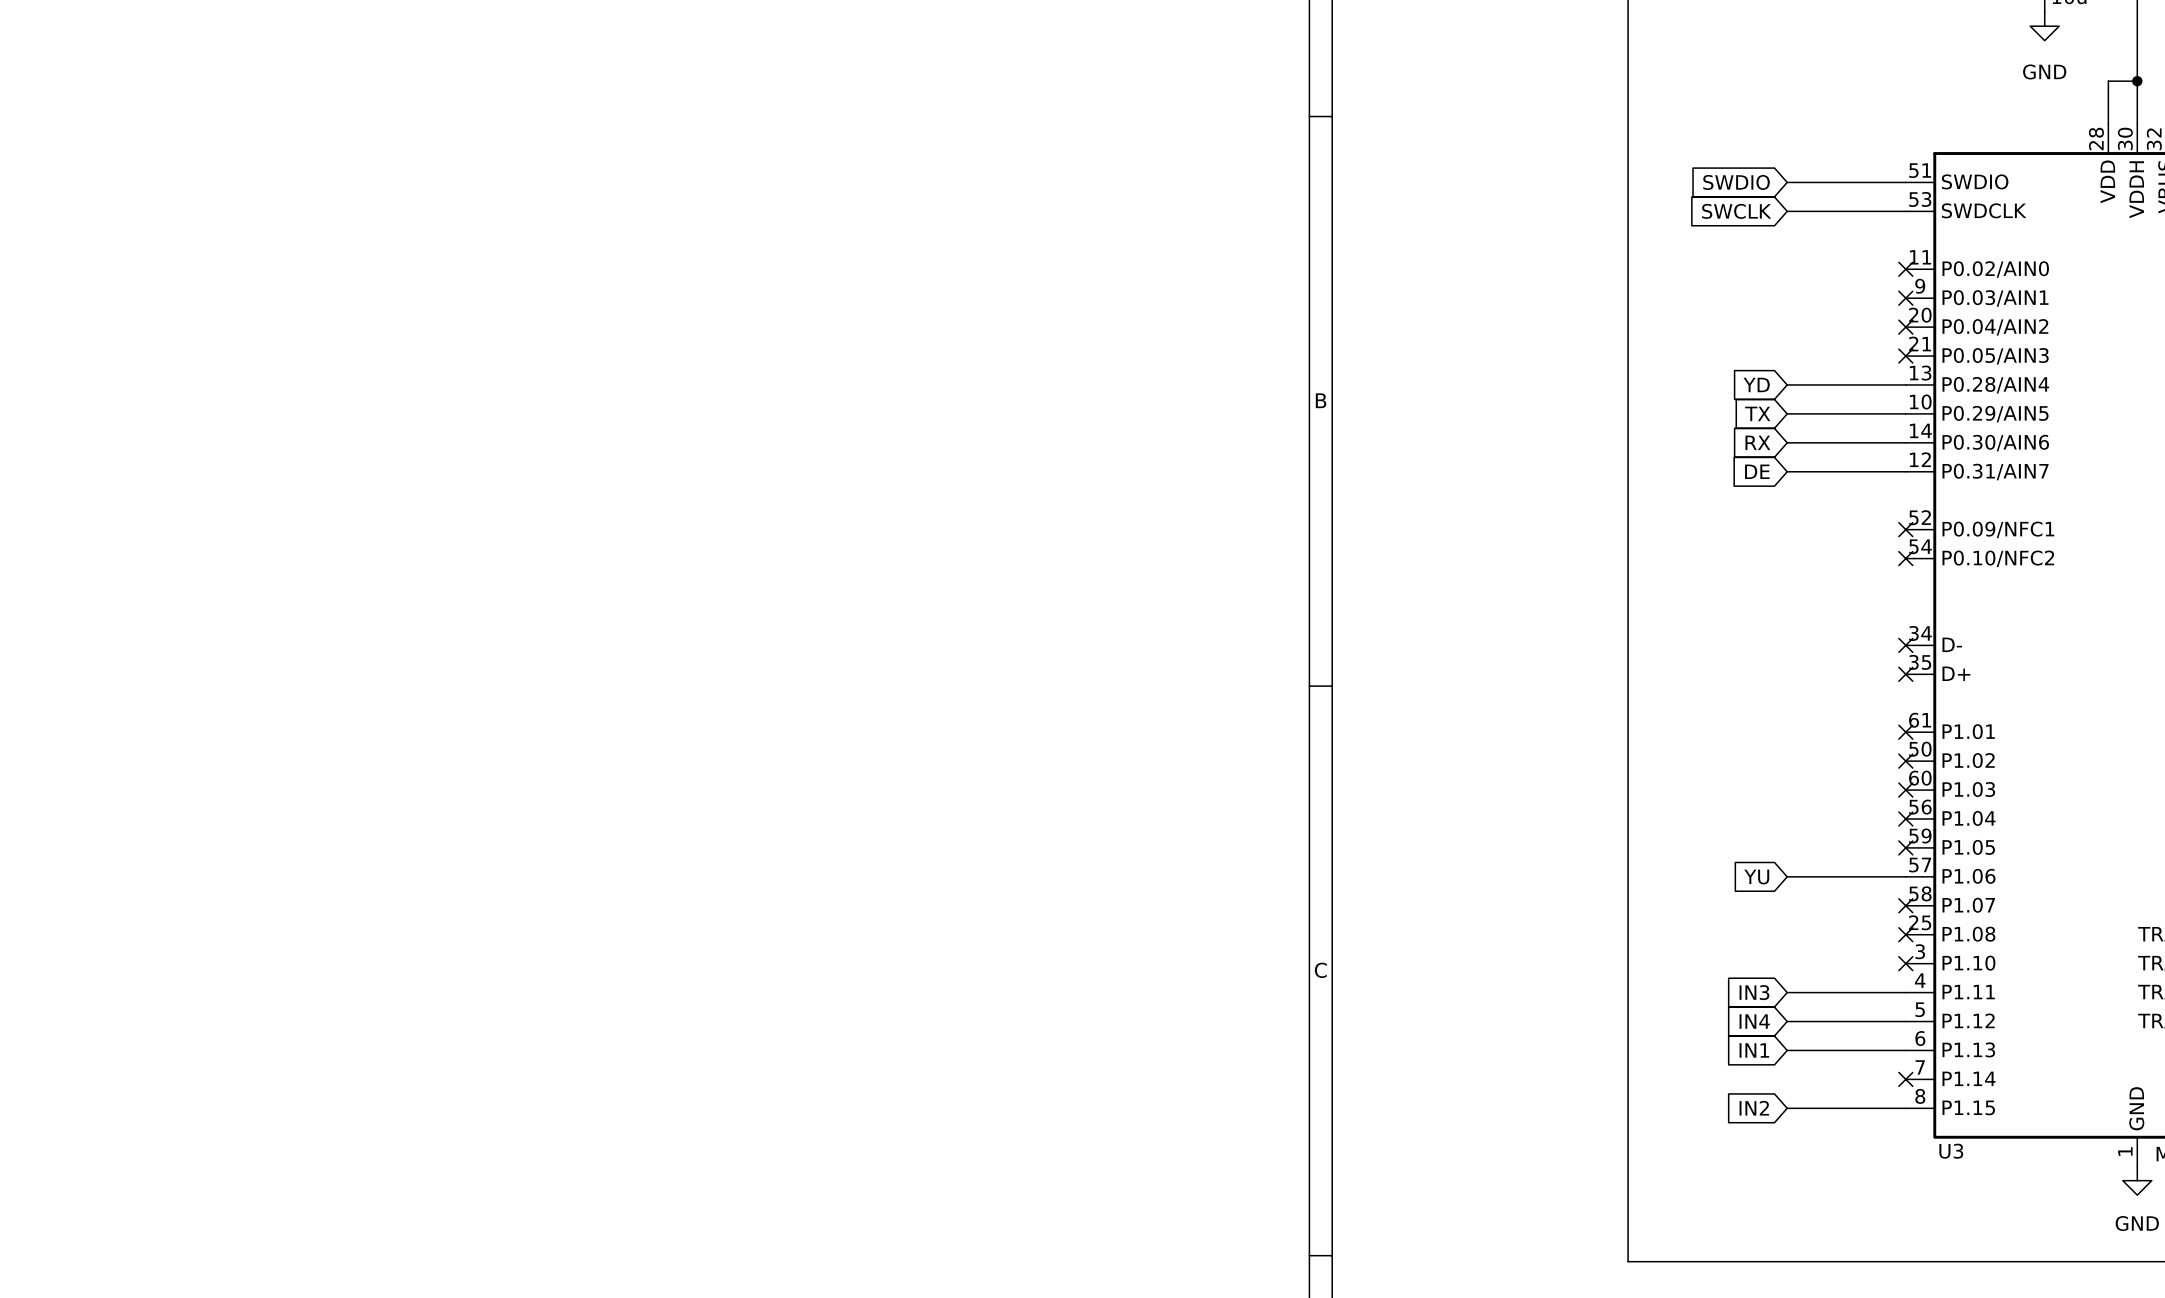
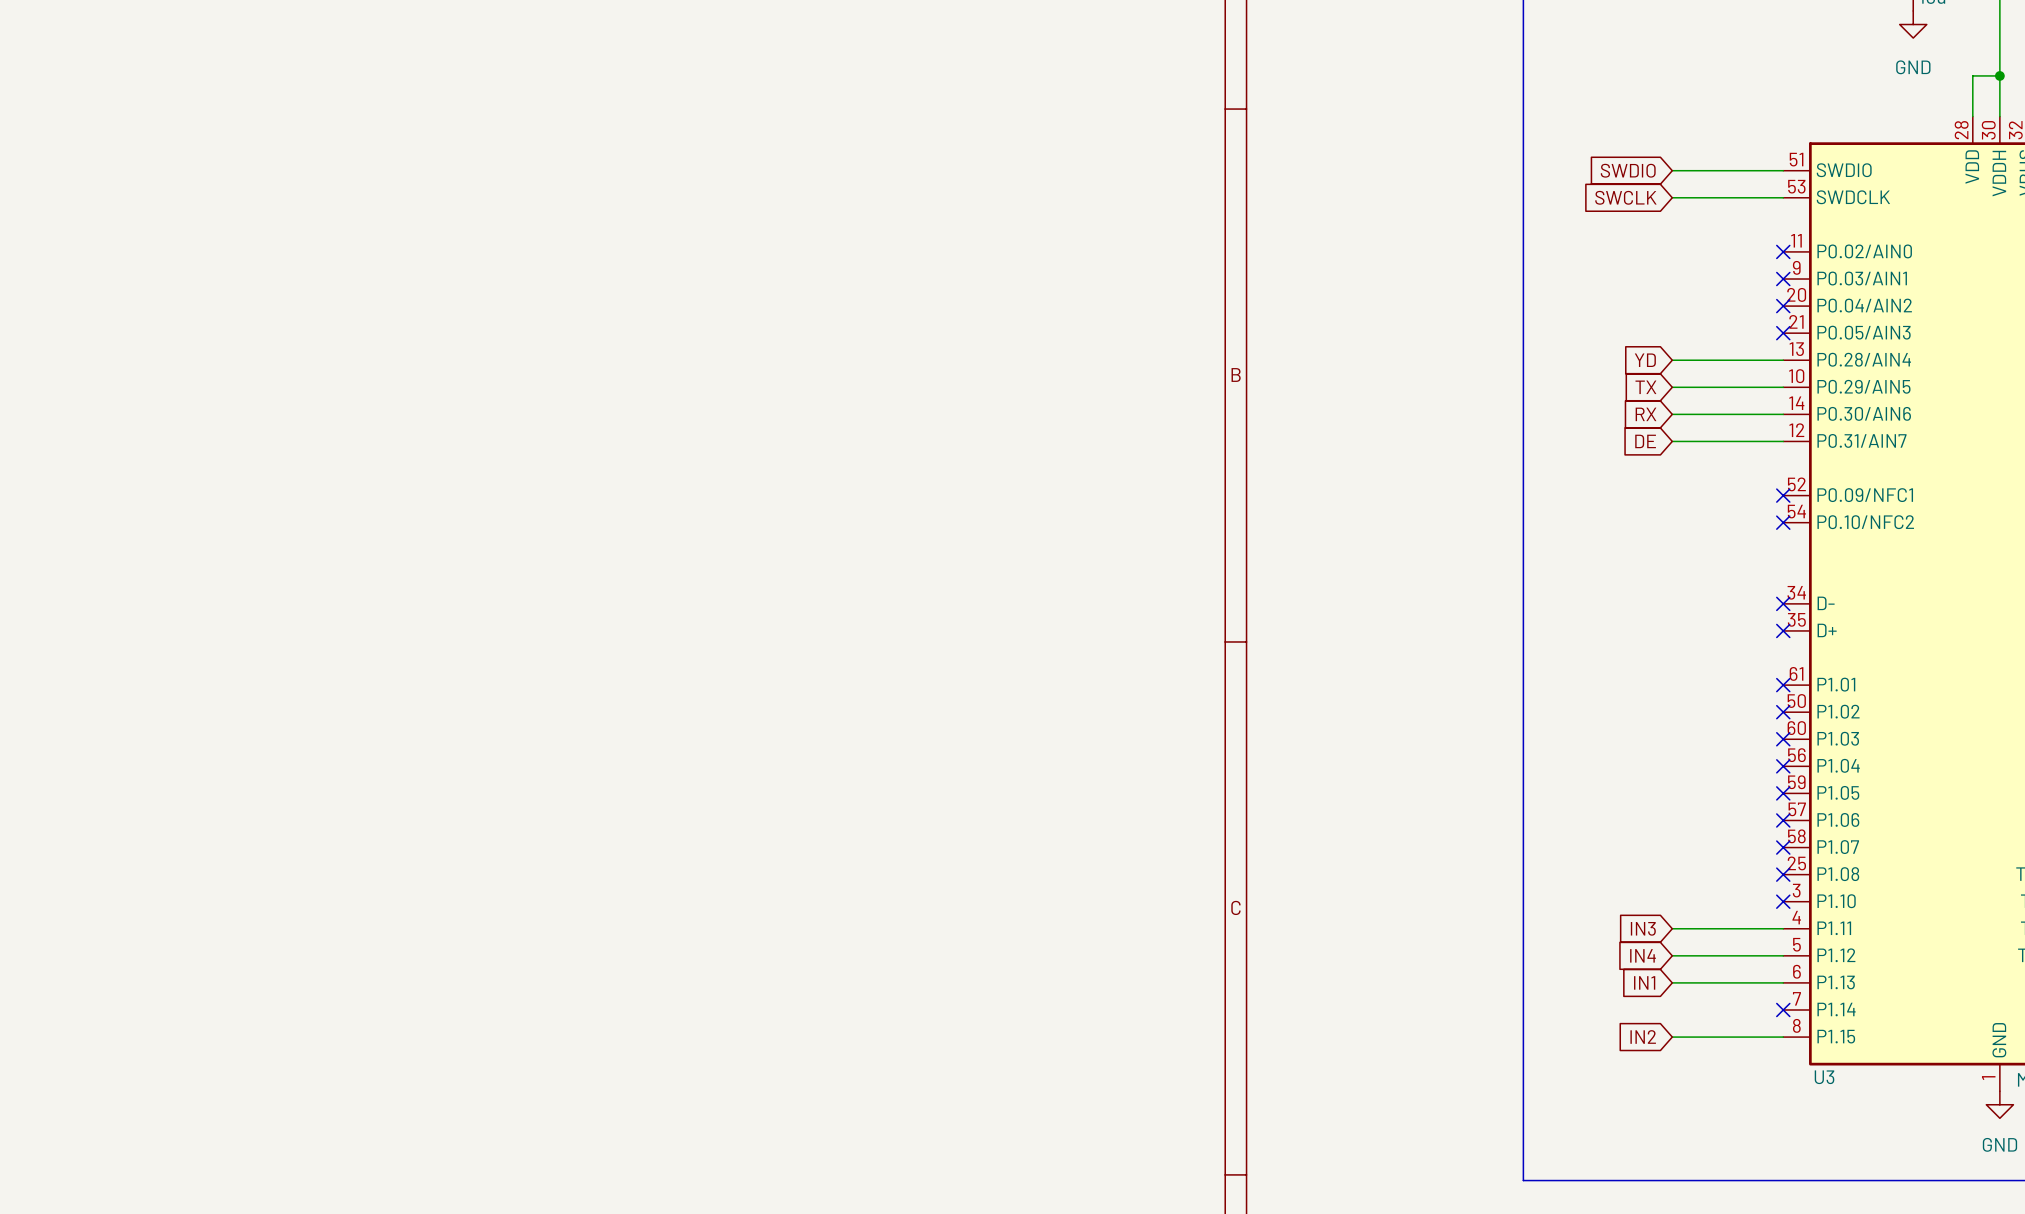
wire: (1787, 876) (1905, 876) -> none
no-connect mark: none -> (1783, 820)
global label: YU (1756, 877) -> none

